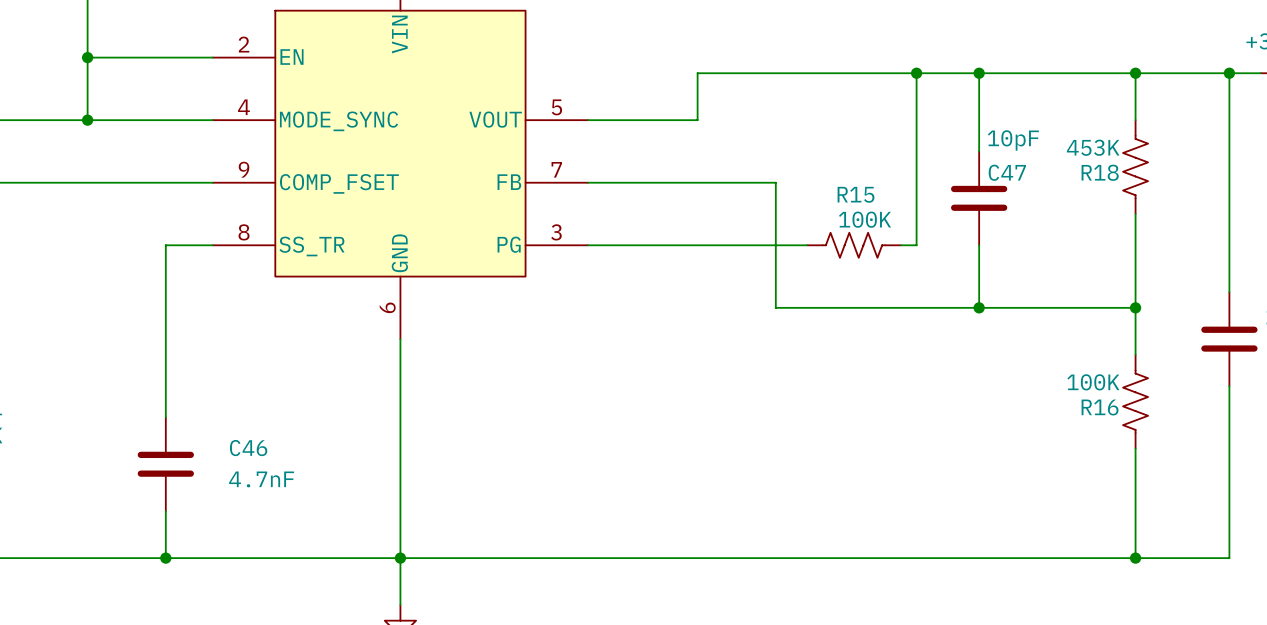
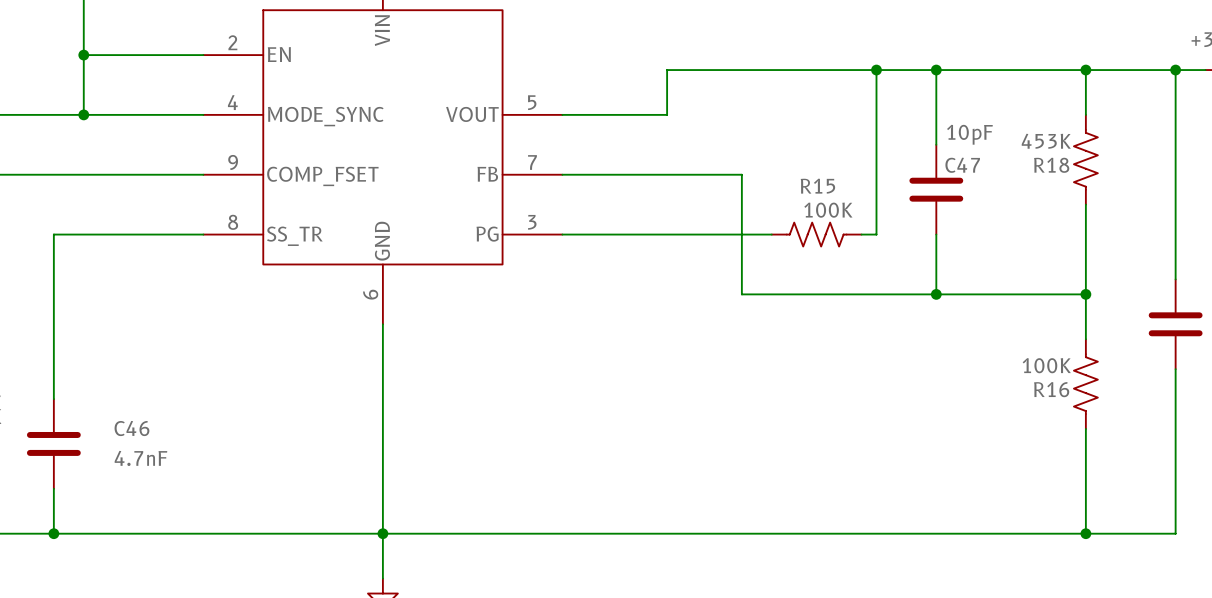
wire: (165, 245) (165, 417) -> (158, 234) (53, 234) (53, 399)
C46 position: (165, 464) -> (53, 443)
wire: (165, 511) (165, 558) -> (53, 488) (53, 533)
junction: none -> (53, 533)
junction: (165, 558) -> none

